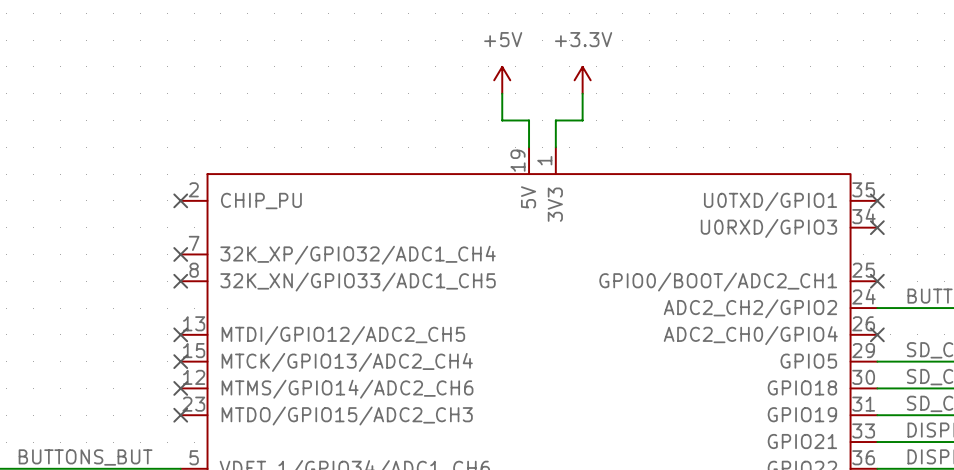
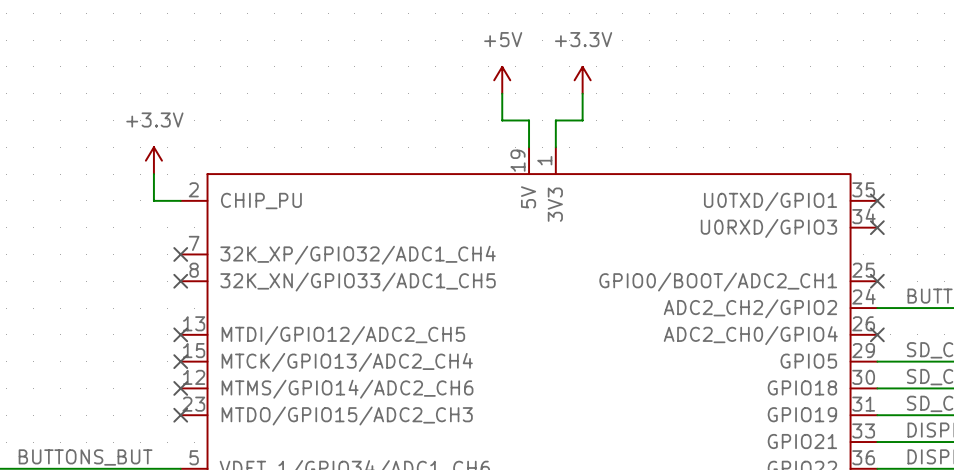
power symbol: none -> +3.3V (153, 160)
wire: none -> (153, 174) (153, 200) (180, 200)
no-connect mark: (180, 200) -> none

